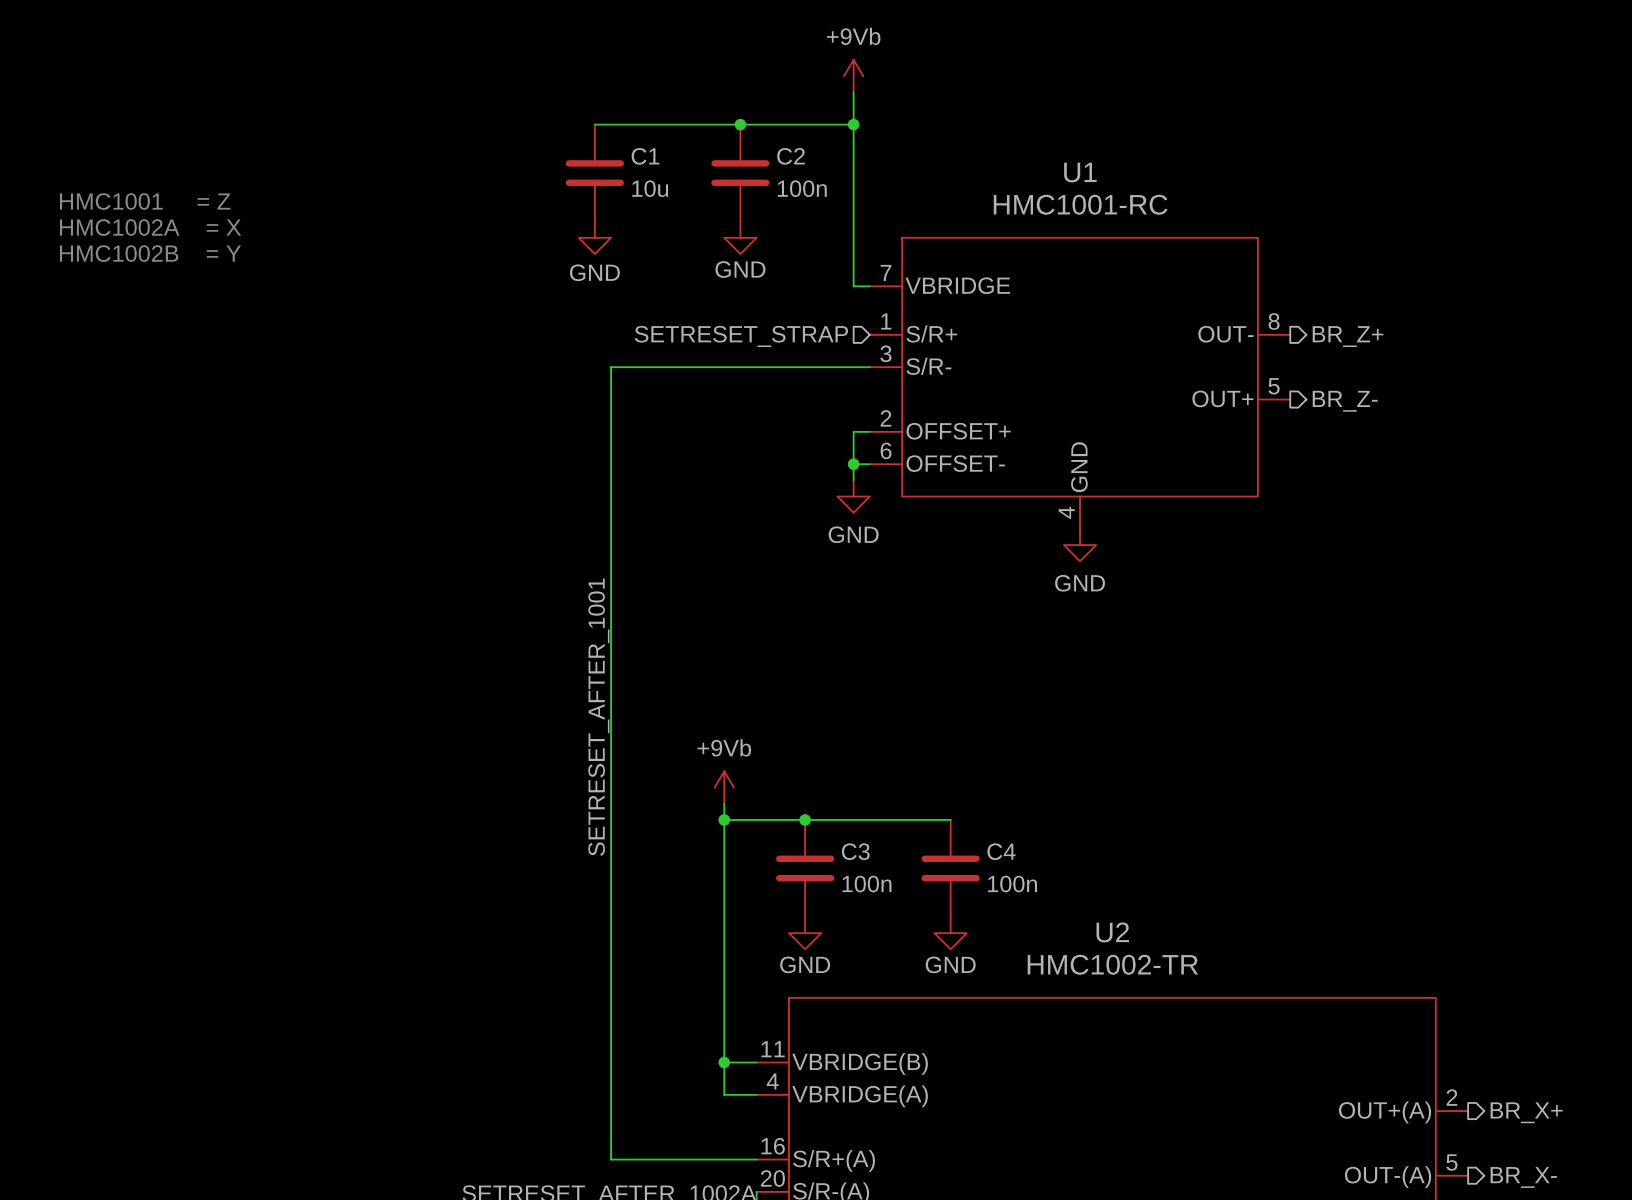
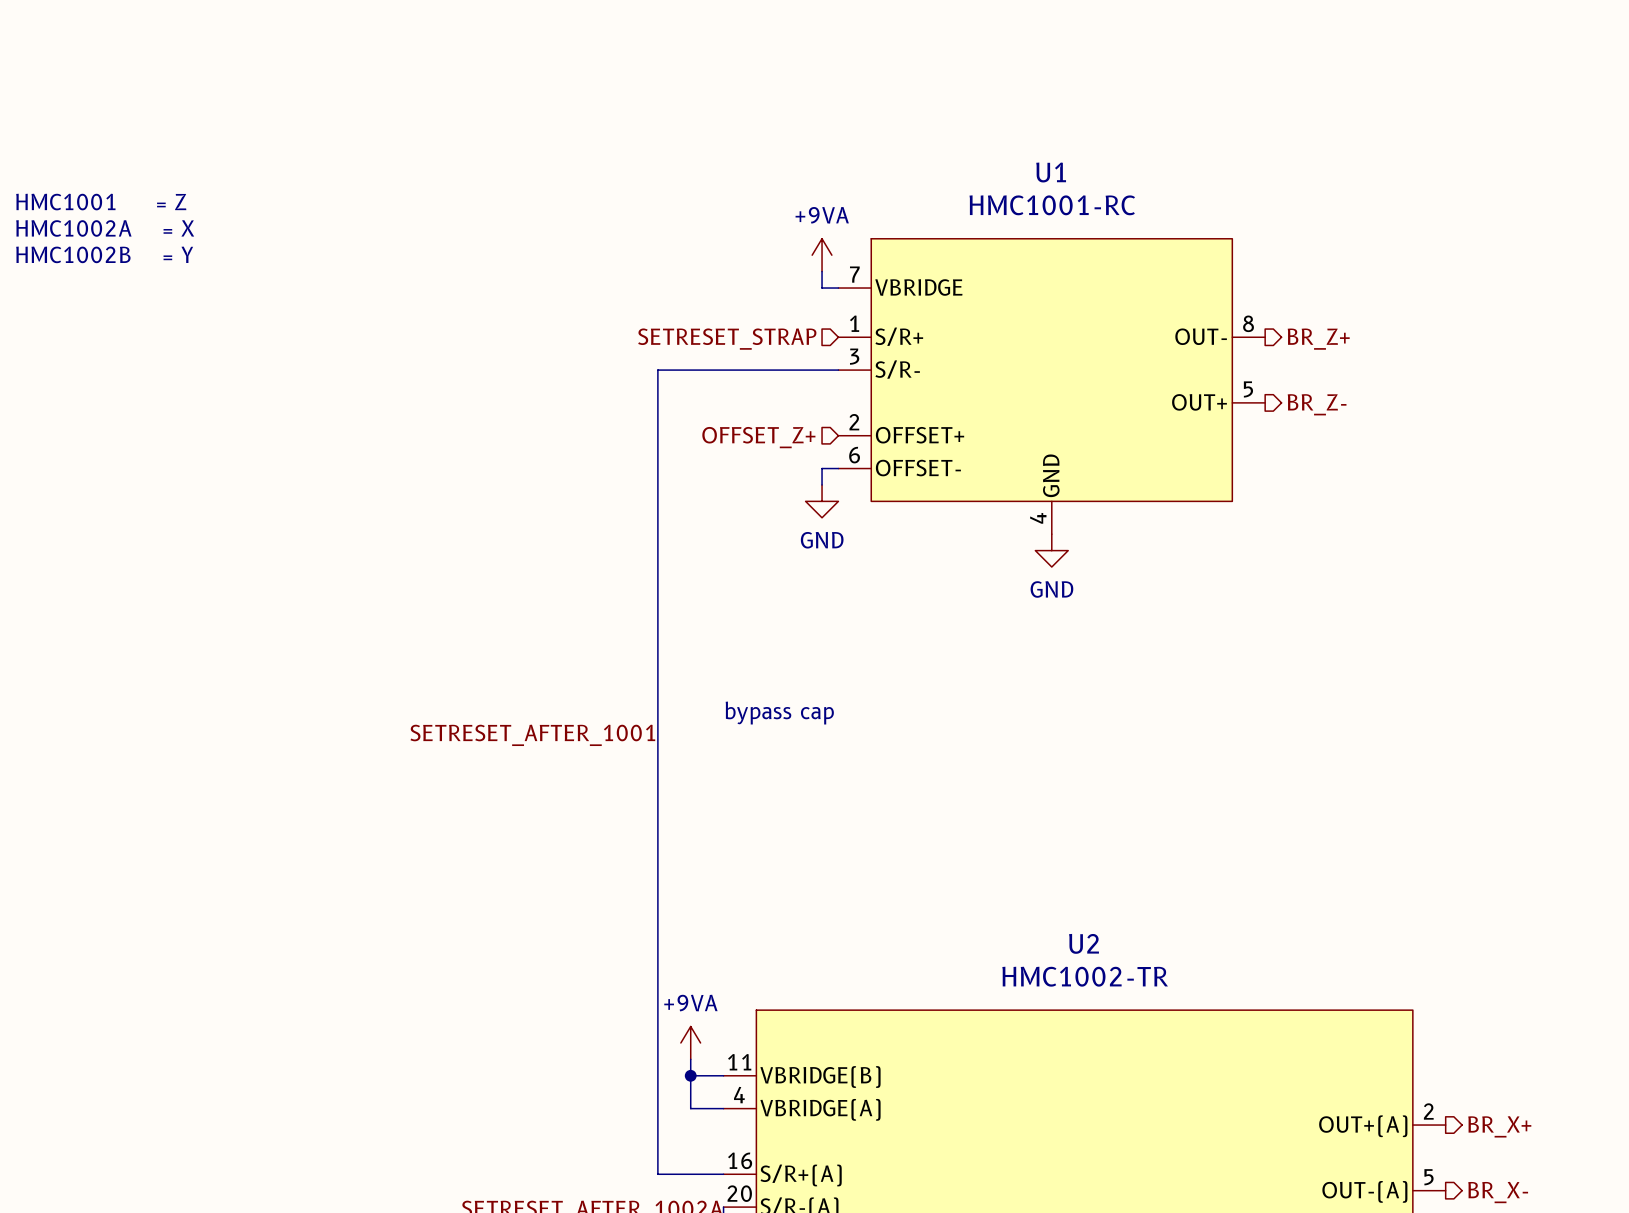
power symbol: +9Vb (853, 76) -> none
wire: (853, 92) (853, 270) -> none
wire: (594, 124) (853, 124) -> none
junction: (740, 124) -> none
junction: (853, 124) -> none
C1: 10u (594, 173) -> none
C2: 100n (740, 173) -> none
power symbol: GND (594, 237) -> none
power symbol: GND (740, 237) -> none
power symbol: none -> +9VA (822, 255)
wire: (691, 367) (611, 367) (611, 1159) (691, 1159) -> (657, 370) (657, 1174)
wire: (869, 431) (853, 431) (853, 464) -> none
hierarchical label: none -> OFFSET_Z+ (758, 437)
junction: (853, 464) -> none
text: none -> bypass cap (779, 713)
label rotation: 0° (598, 717) -> 90° clockwise (532, 735)
power symbol: +9Vb (724, 787) -> none
wire: (724, 803) (724, 1046) -> none
wire: (724, 819) (950, 819) -> none
junction: (724, 819) -> none
junction: (805, 819) -> none
C3: 100n (805, 868) -> none
C4: 100n (950, 868) -> none
power symbol: GND (805, 933) -> none
power symbol: GND (950, 933) -> none
power symbol: none -> +9VA (690, 1042)

